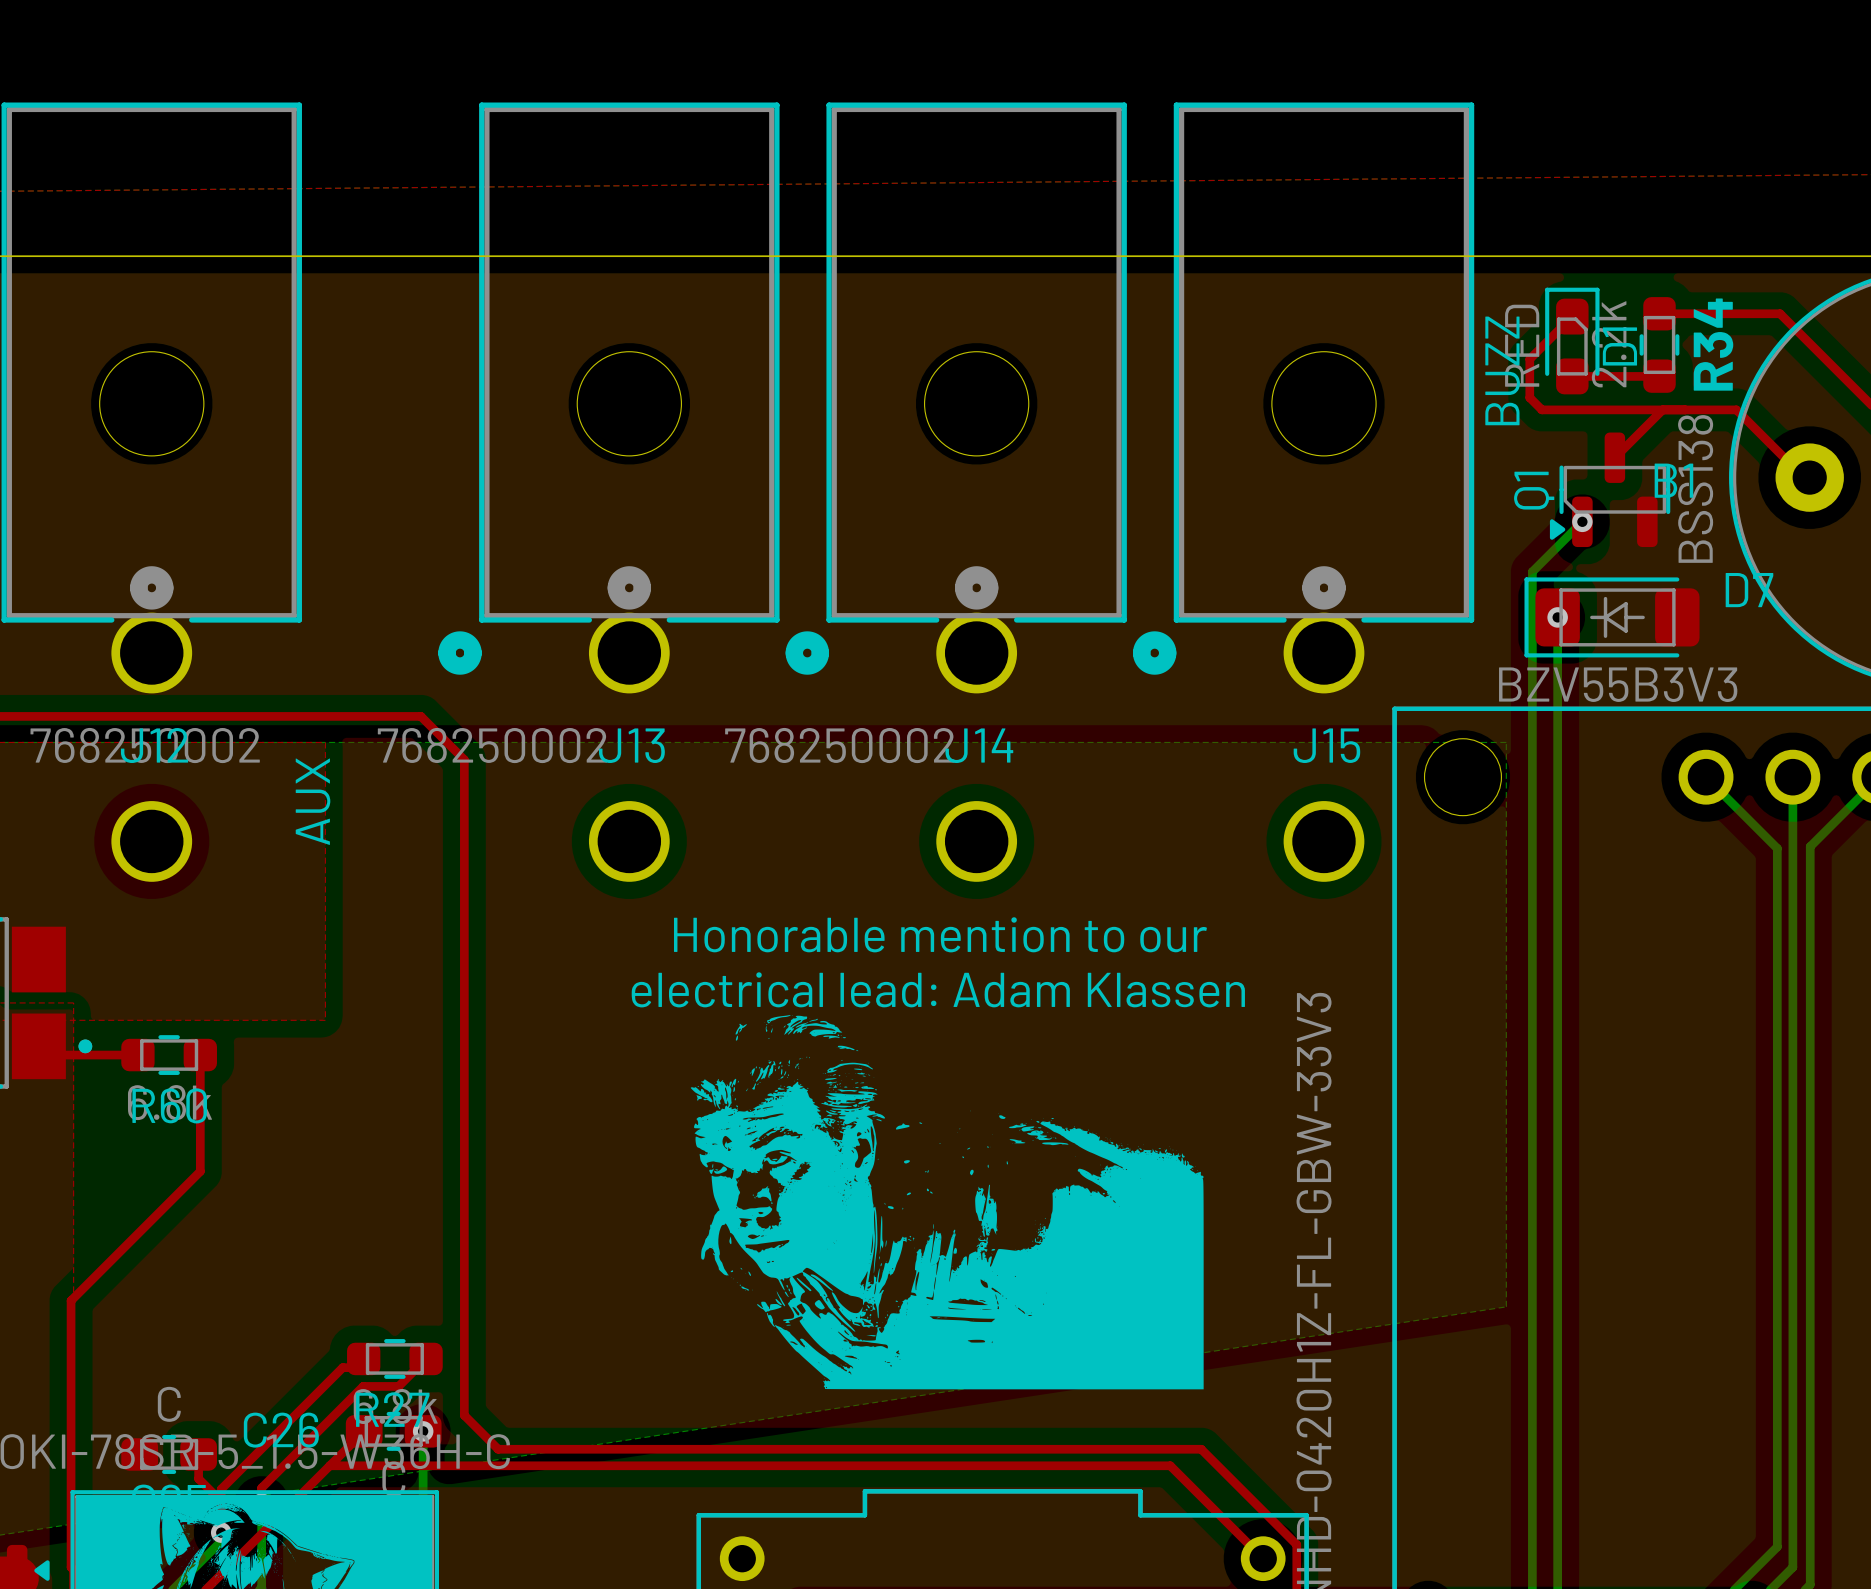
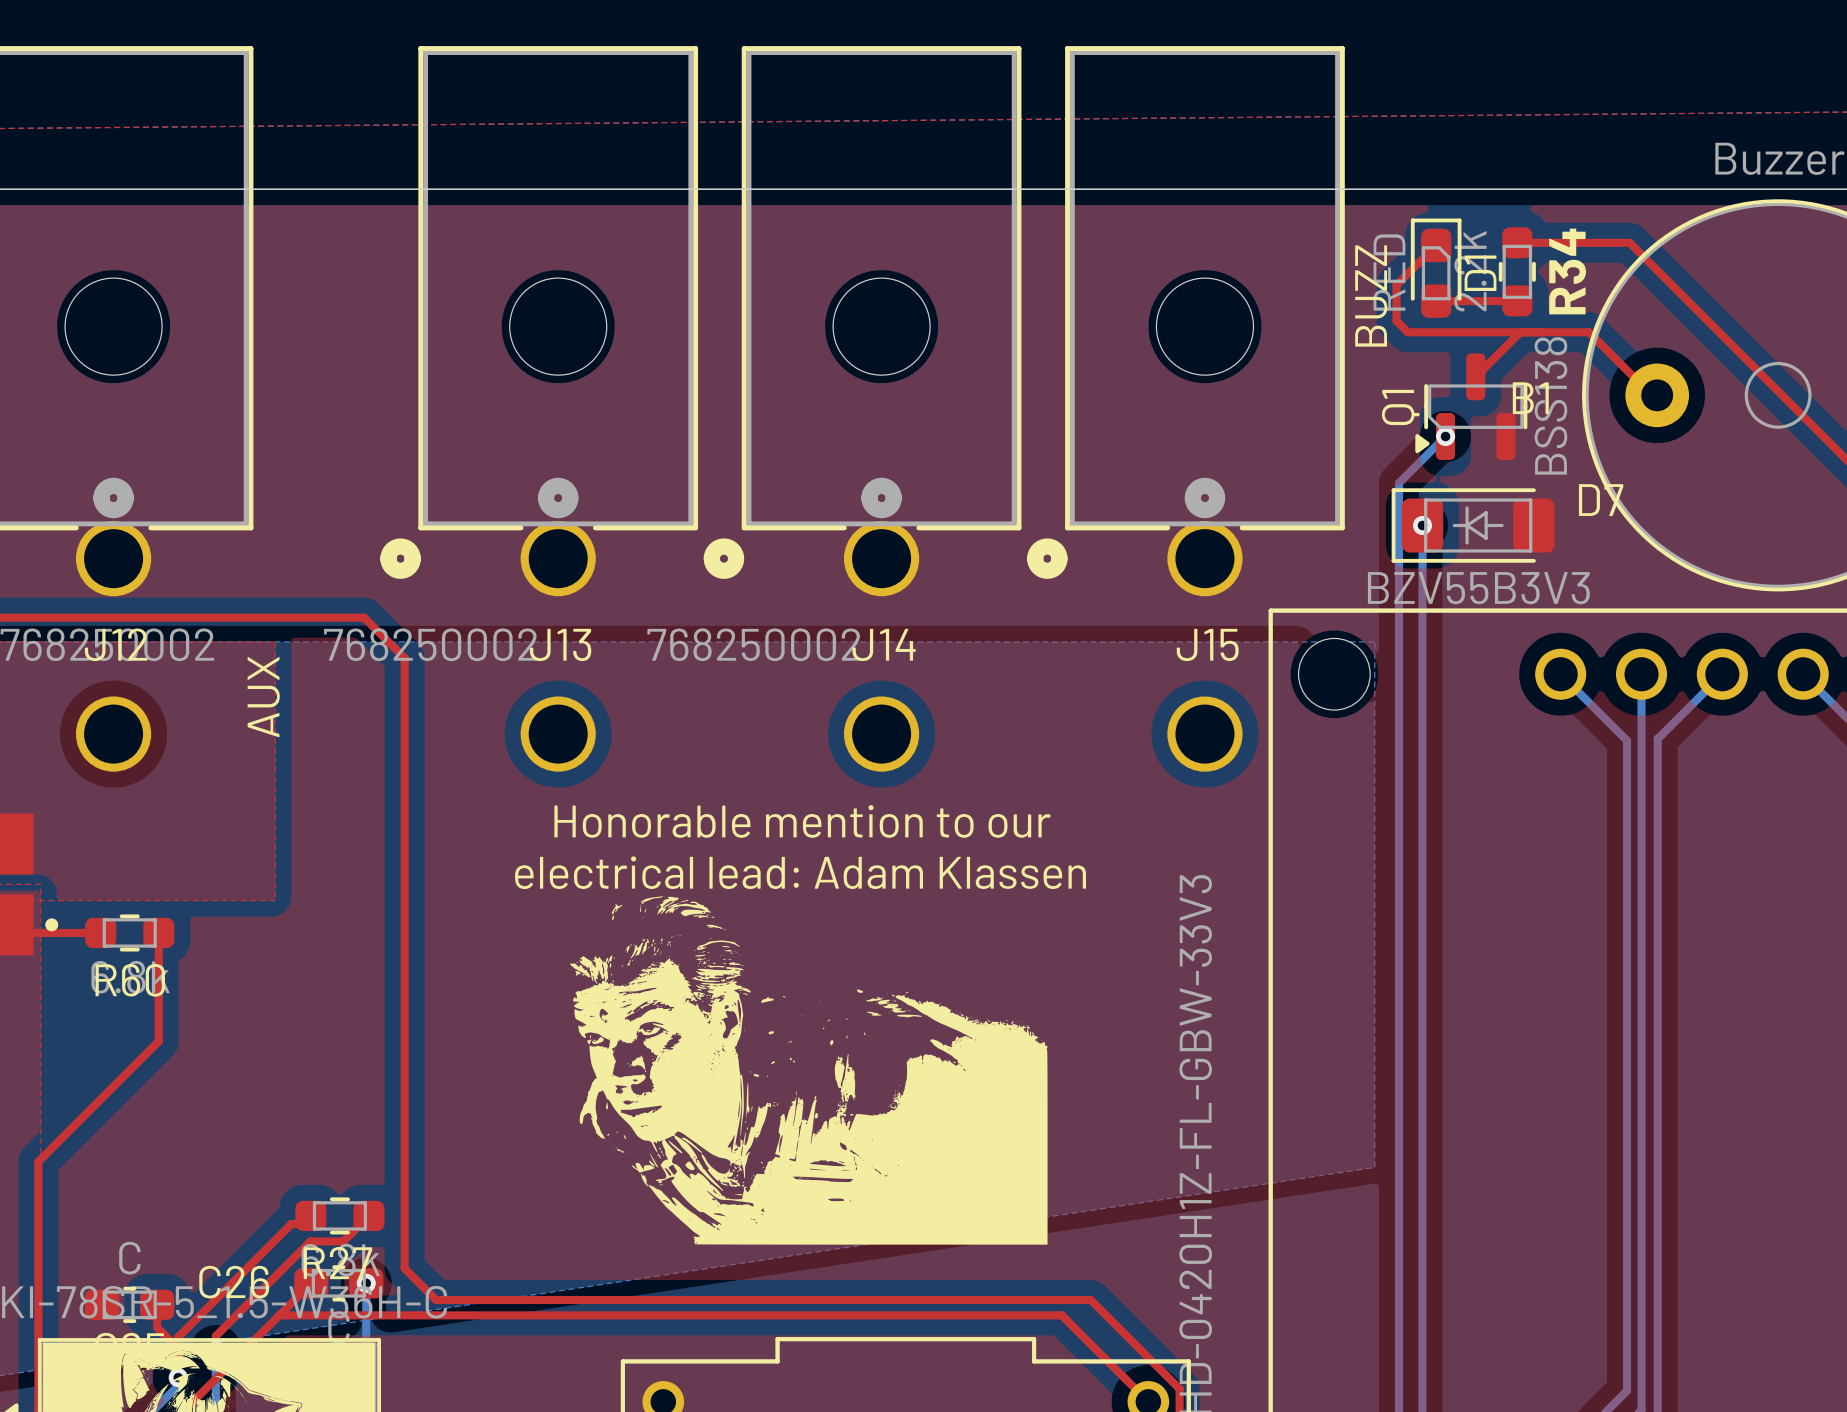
text position: Honorable mention to our (940, 934) -> Honorable mention to our (802, 821)
text position: electrical lead: Adam Klassen (938, 989) -> electrical lead: Adam Klassen (800, 872)
drawing position: (947, 1202) -> (808, 1070)

